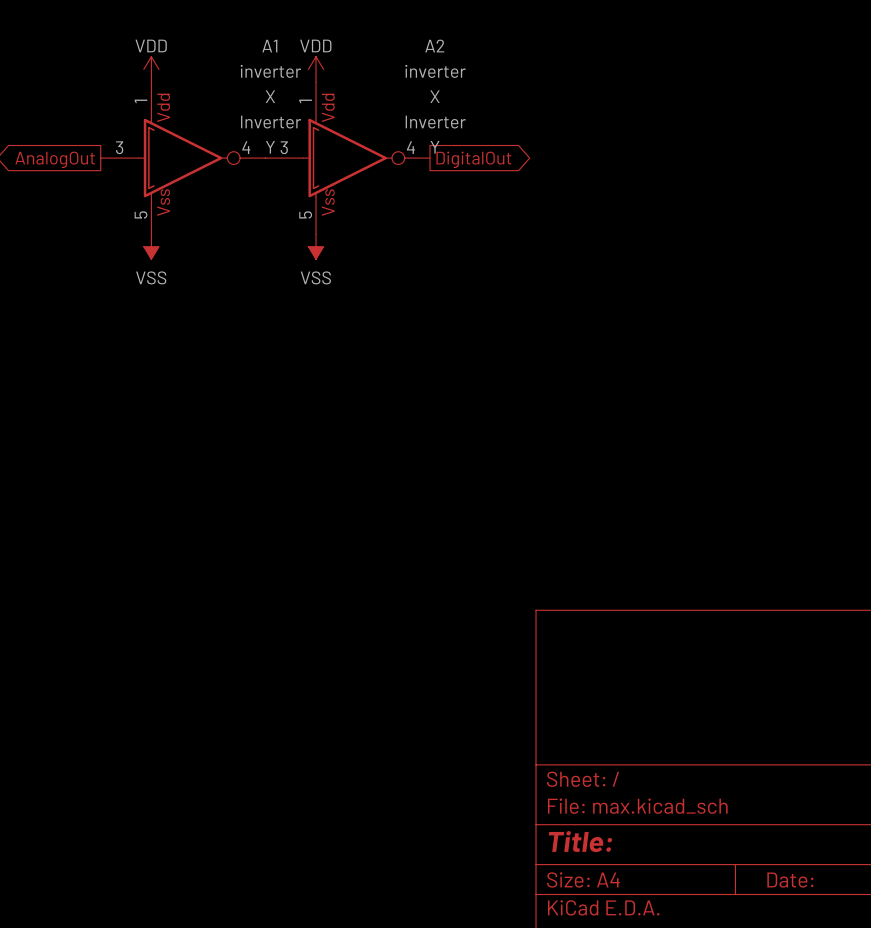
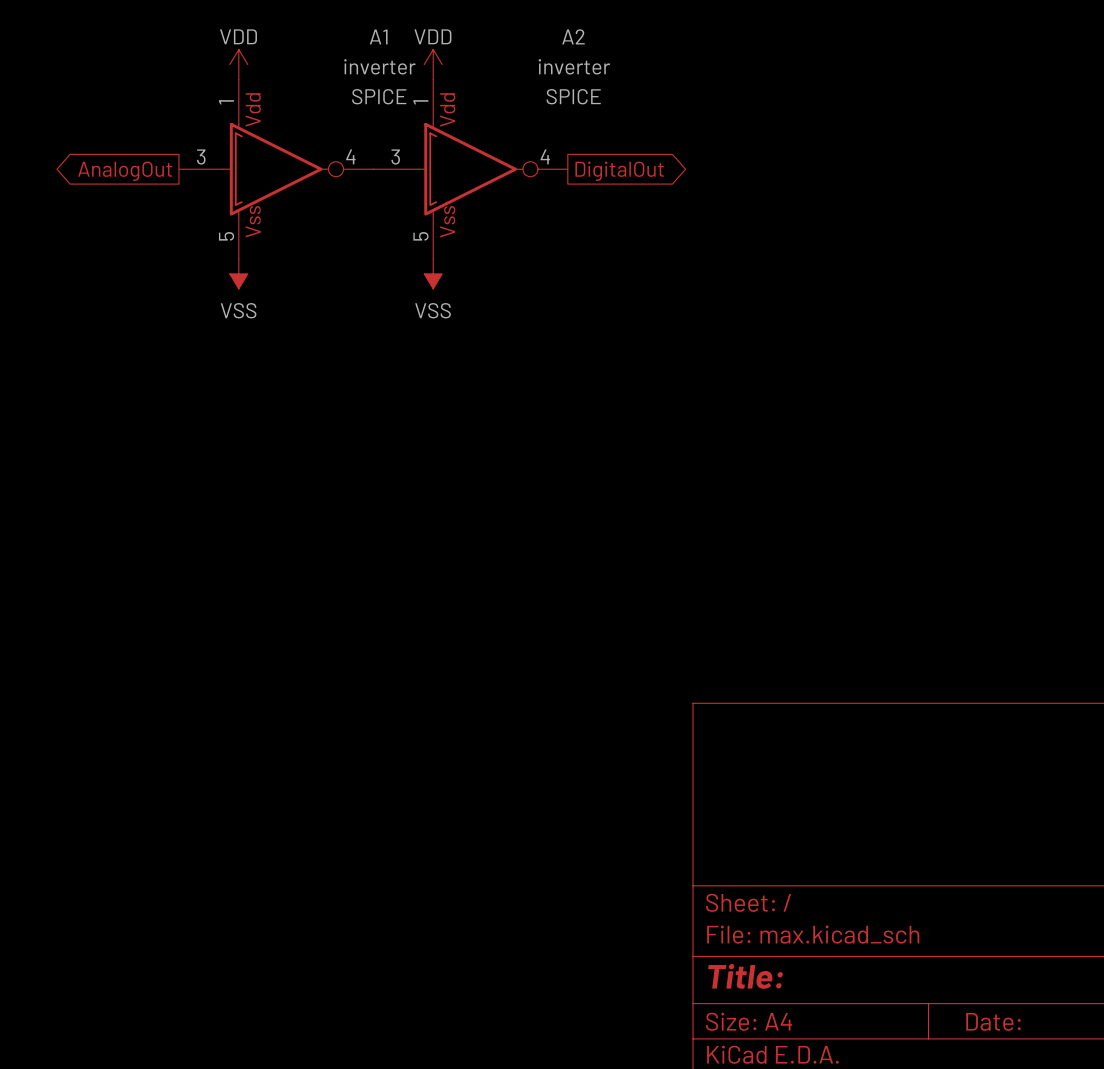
A1 text: none -> SPICE (379, 96)
A1 text: X (270, 96) -> none
A2 text: none -> SPICE (573, 96)
A2 text: X (435, 96) -> none
A1 text: Inverter (271, 122) -> none
A2 text: Inverter (435, 122) -> none
A1 text: Y (270, 147) -> none
A2 text: Y (435, 147) -> none

